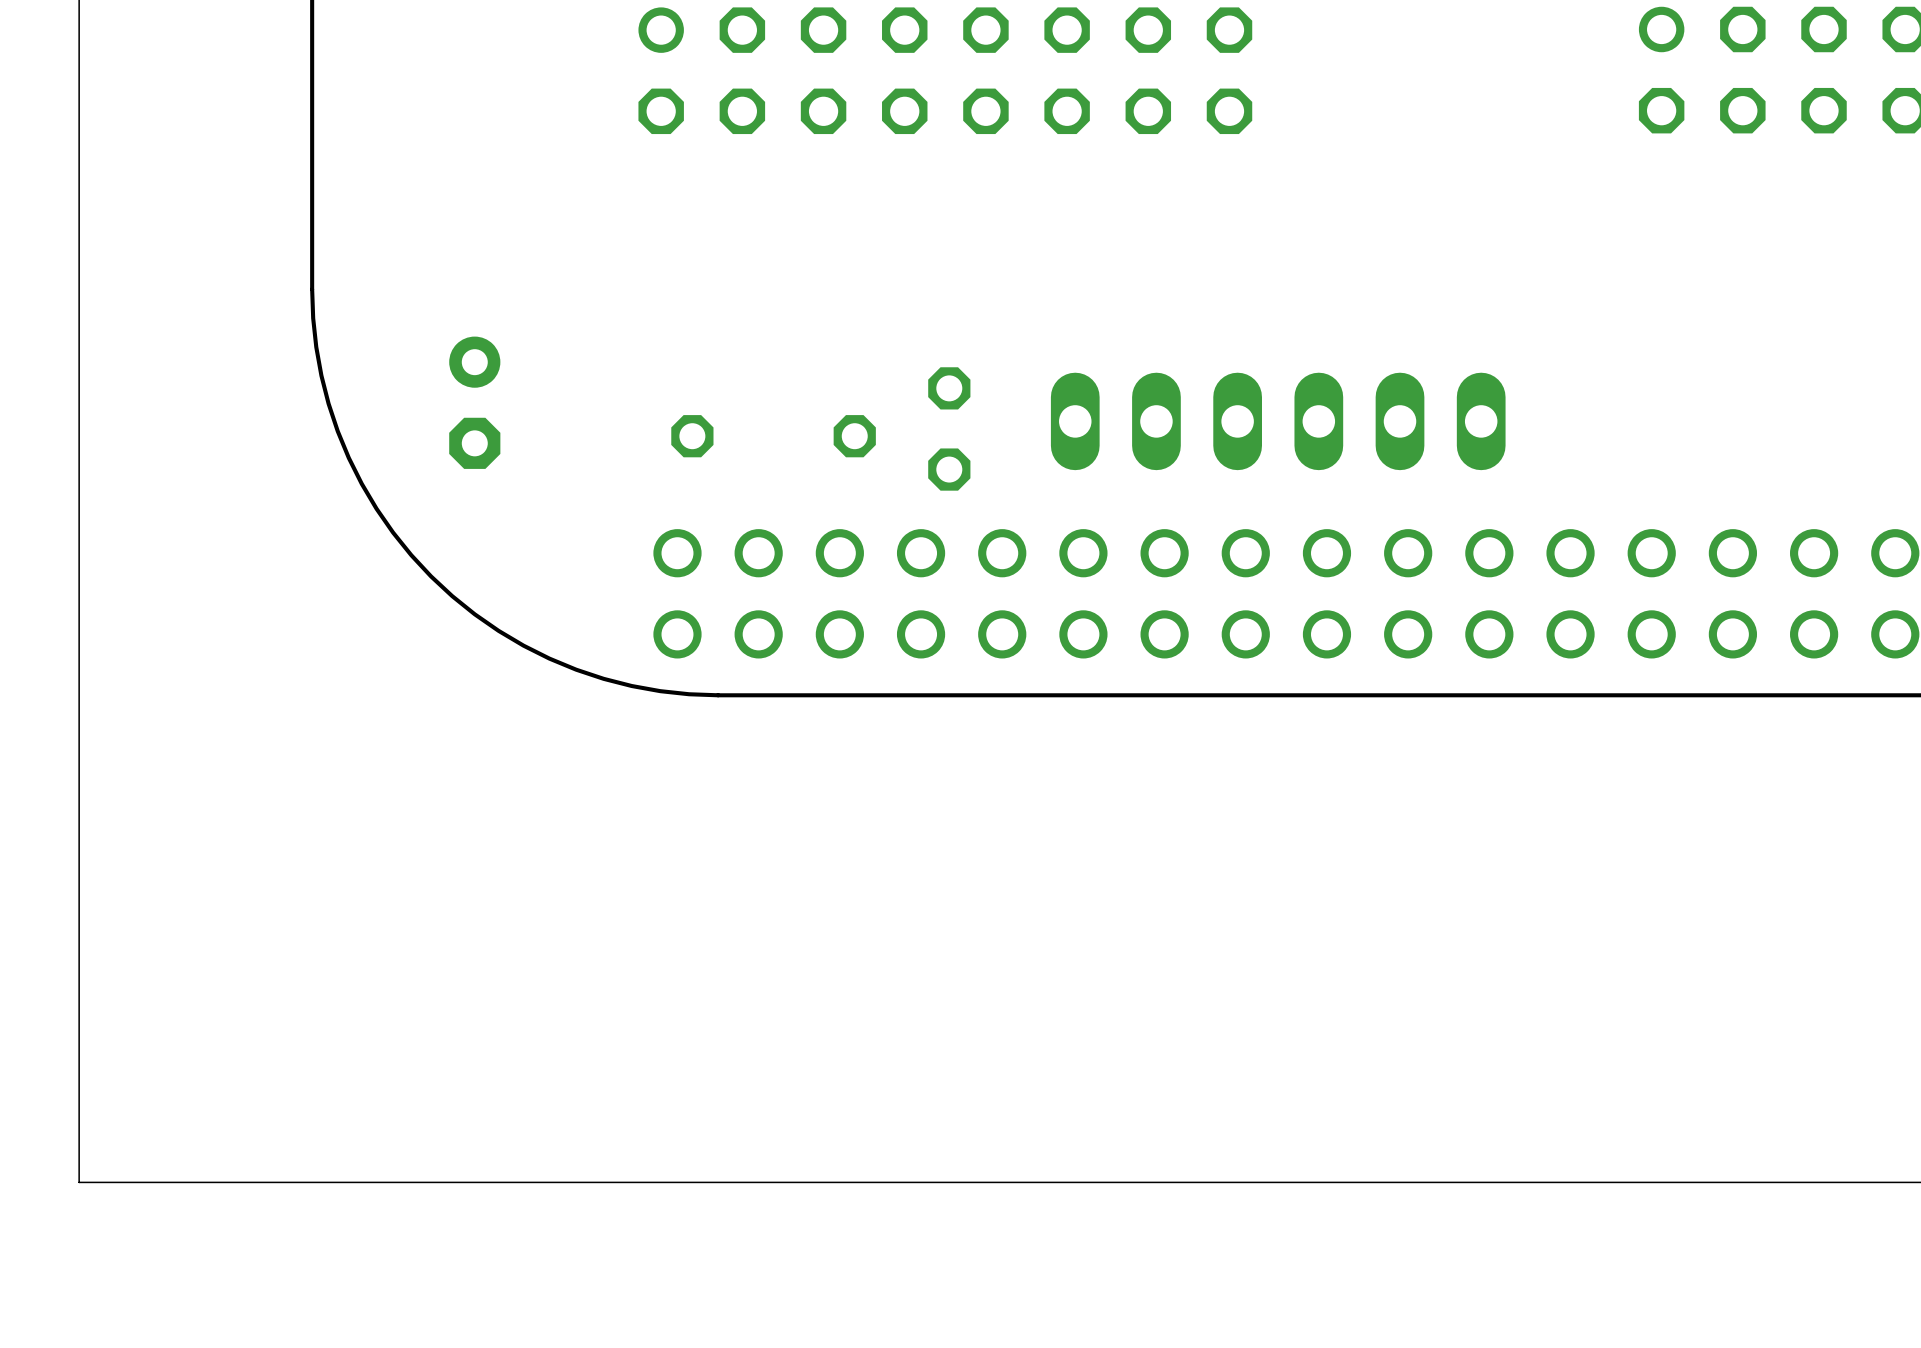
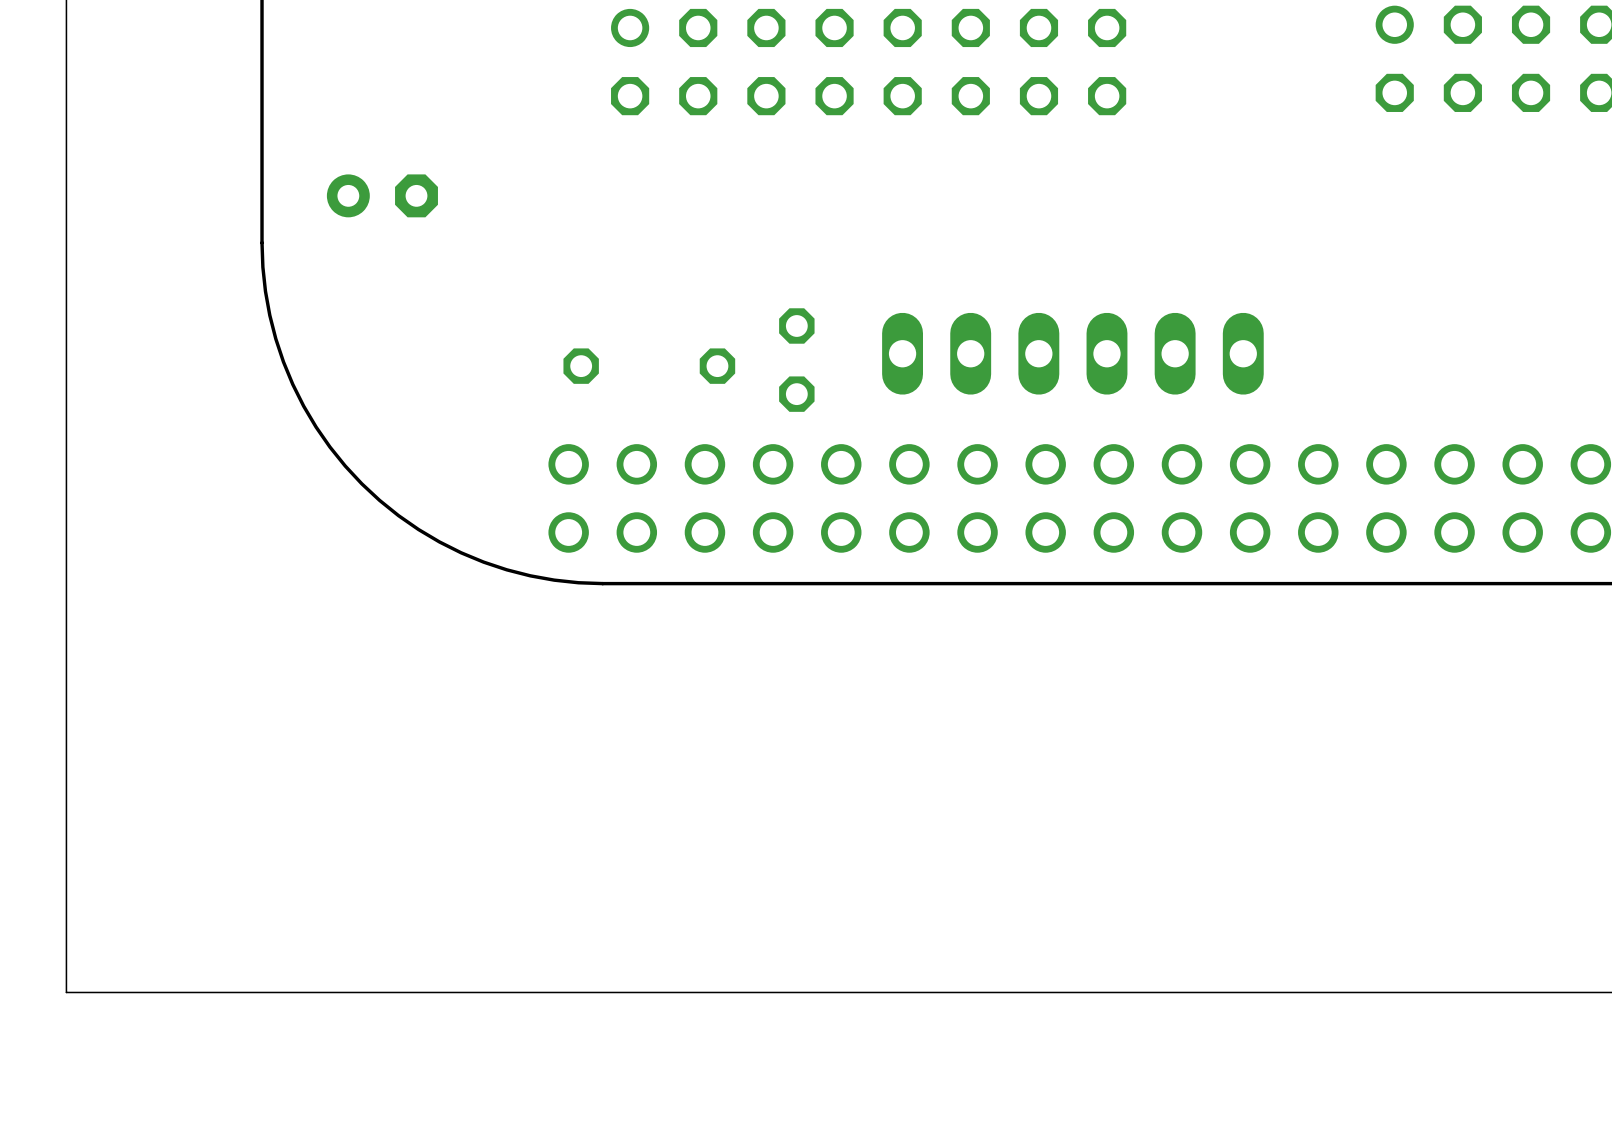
part position: (945, 70) -> (868, 62)
part rotation: 0° (474, 402) -> 90° counterclockwise (382, 195)
part position: (474, 402) -> (382, 195)

